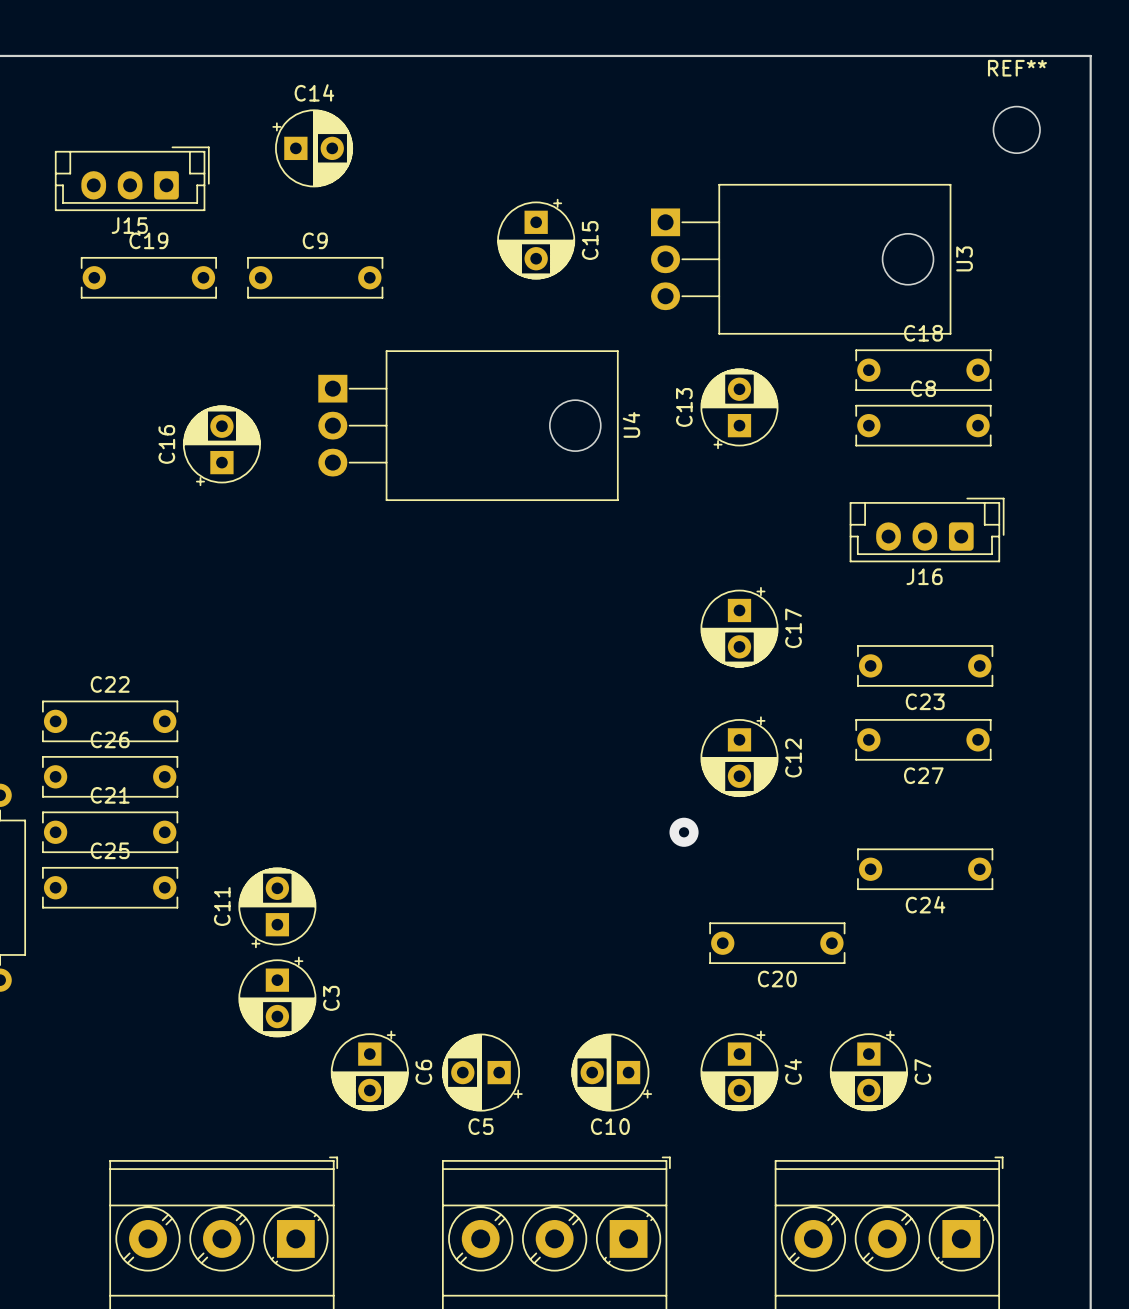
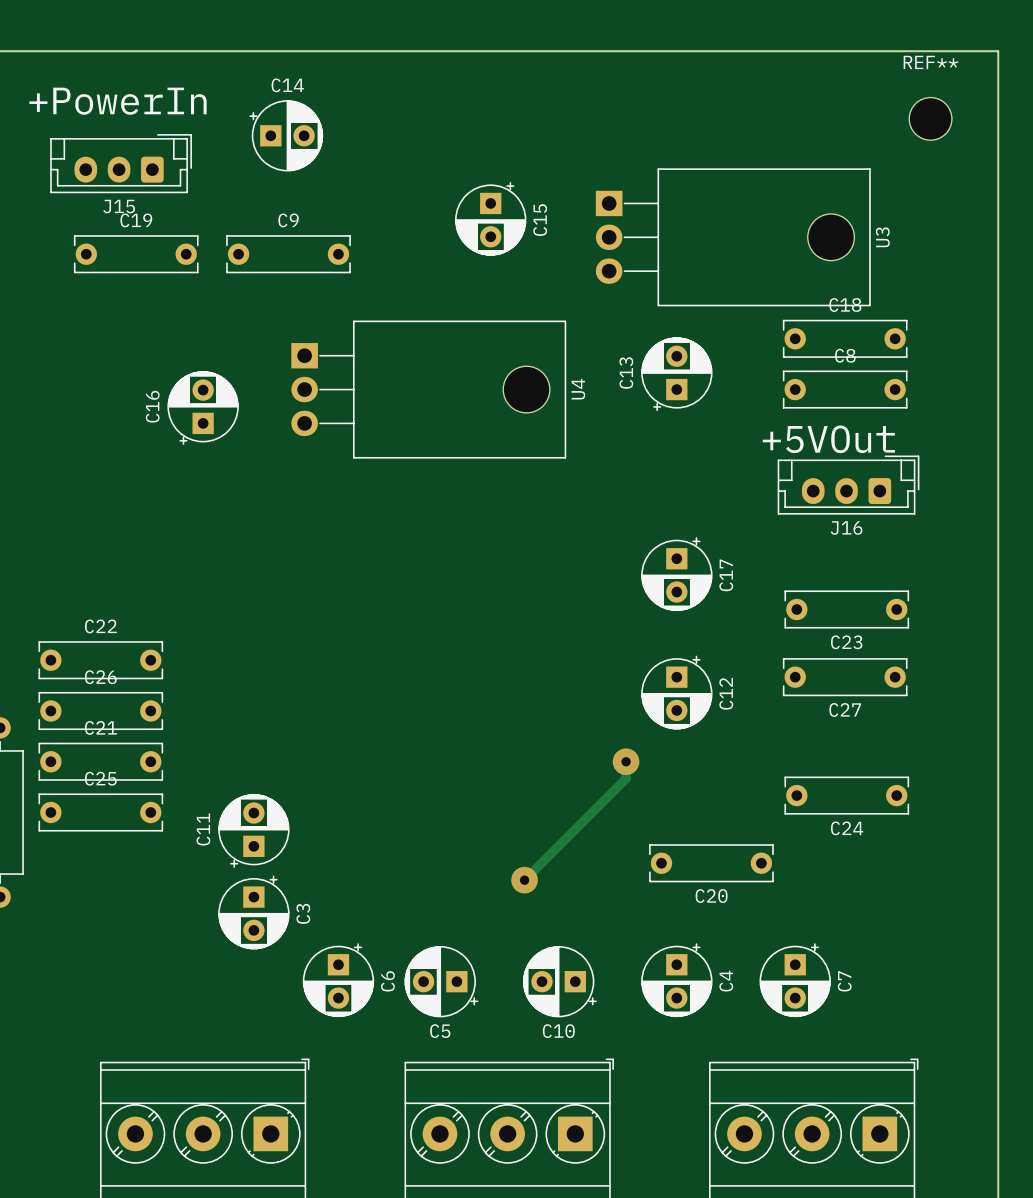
text: none -> +PowerIn (117, 101)
text: none -> +5VOut (828, 439)
track: none -> (626, 761) (626, 778) (524, 880)
via: none -> (524, 880)

